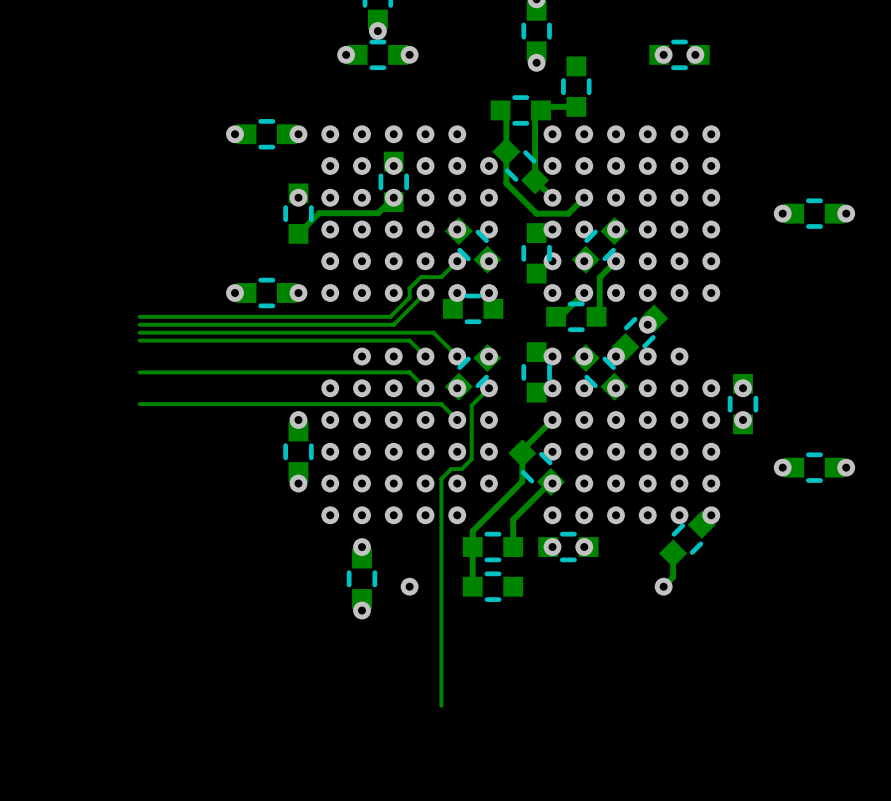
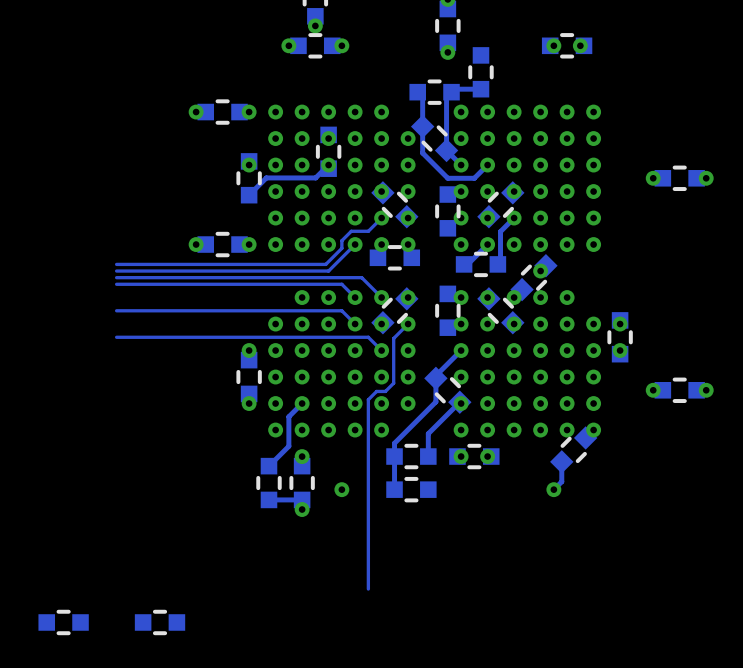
track: none -> (302, 403) (288, 416) (288, 446) (268, 466)
part: none -> (268, 483)
track: none -> (302, 499) (268, 499)
part: none -> (63, 622)
part: none -> (160, 622)

